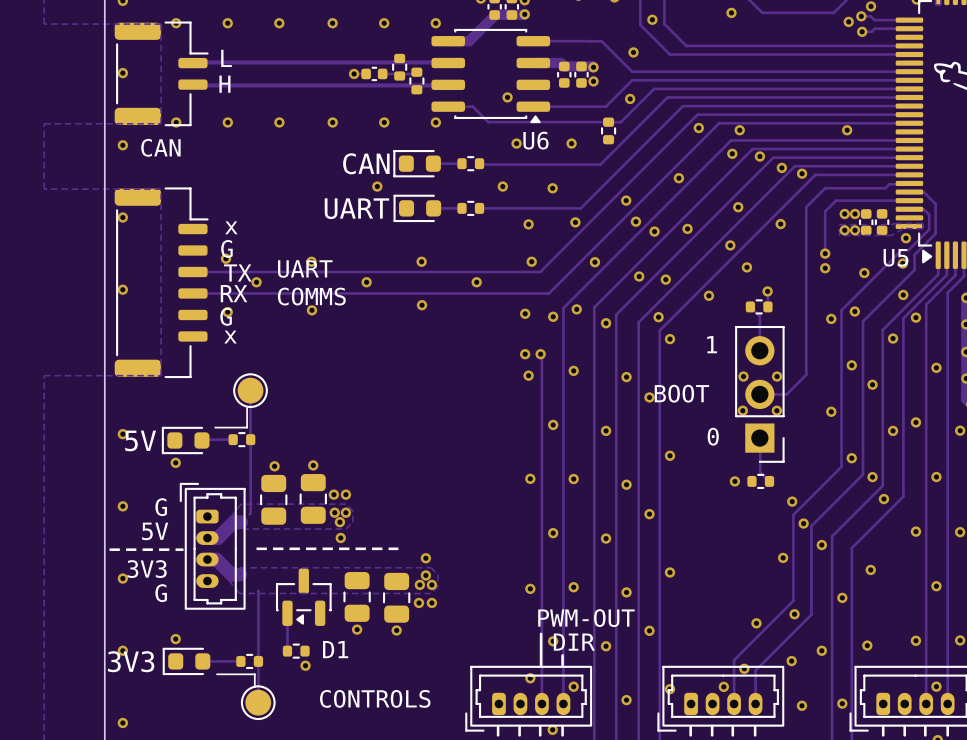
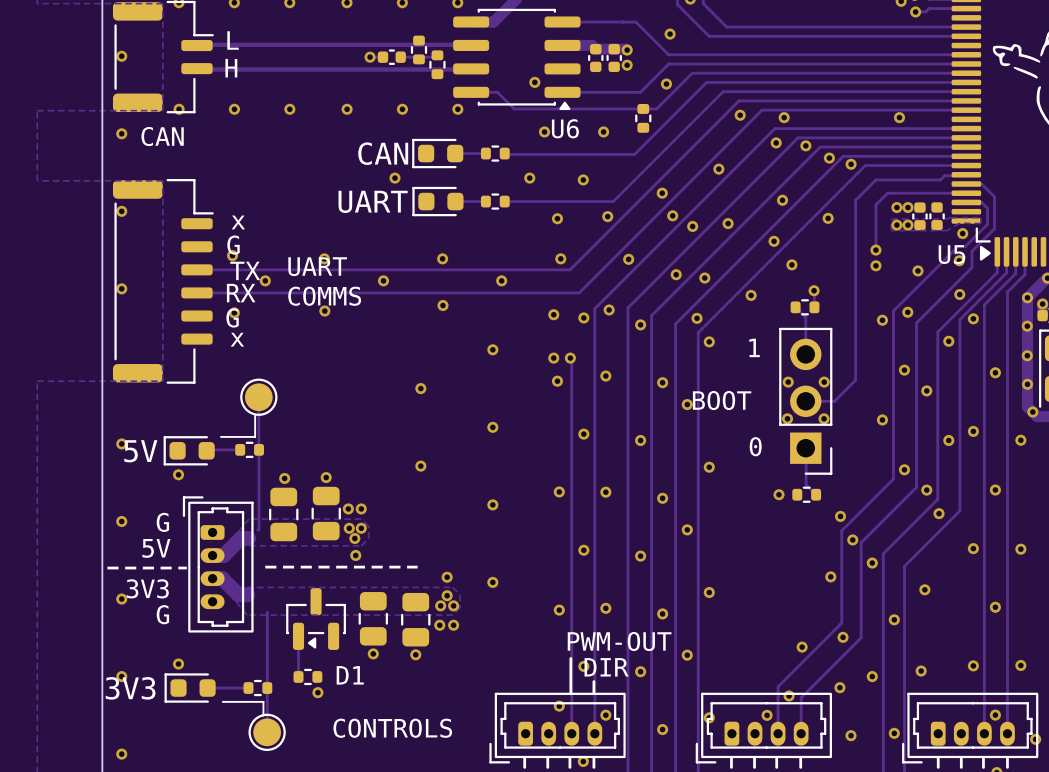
via: none -> (492, 349)
via: none -> (420, 388)
via: none -> (492, 427)
via: none -> (420, 466)
via: none -> (492, 504)
via: none -> (492, 582)

